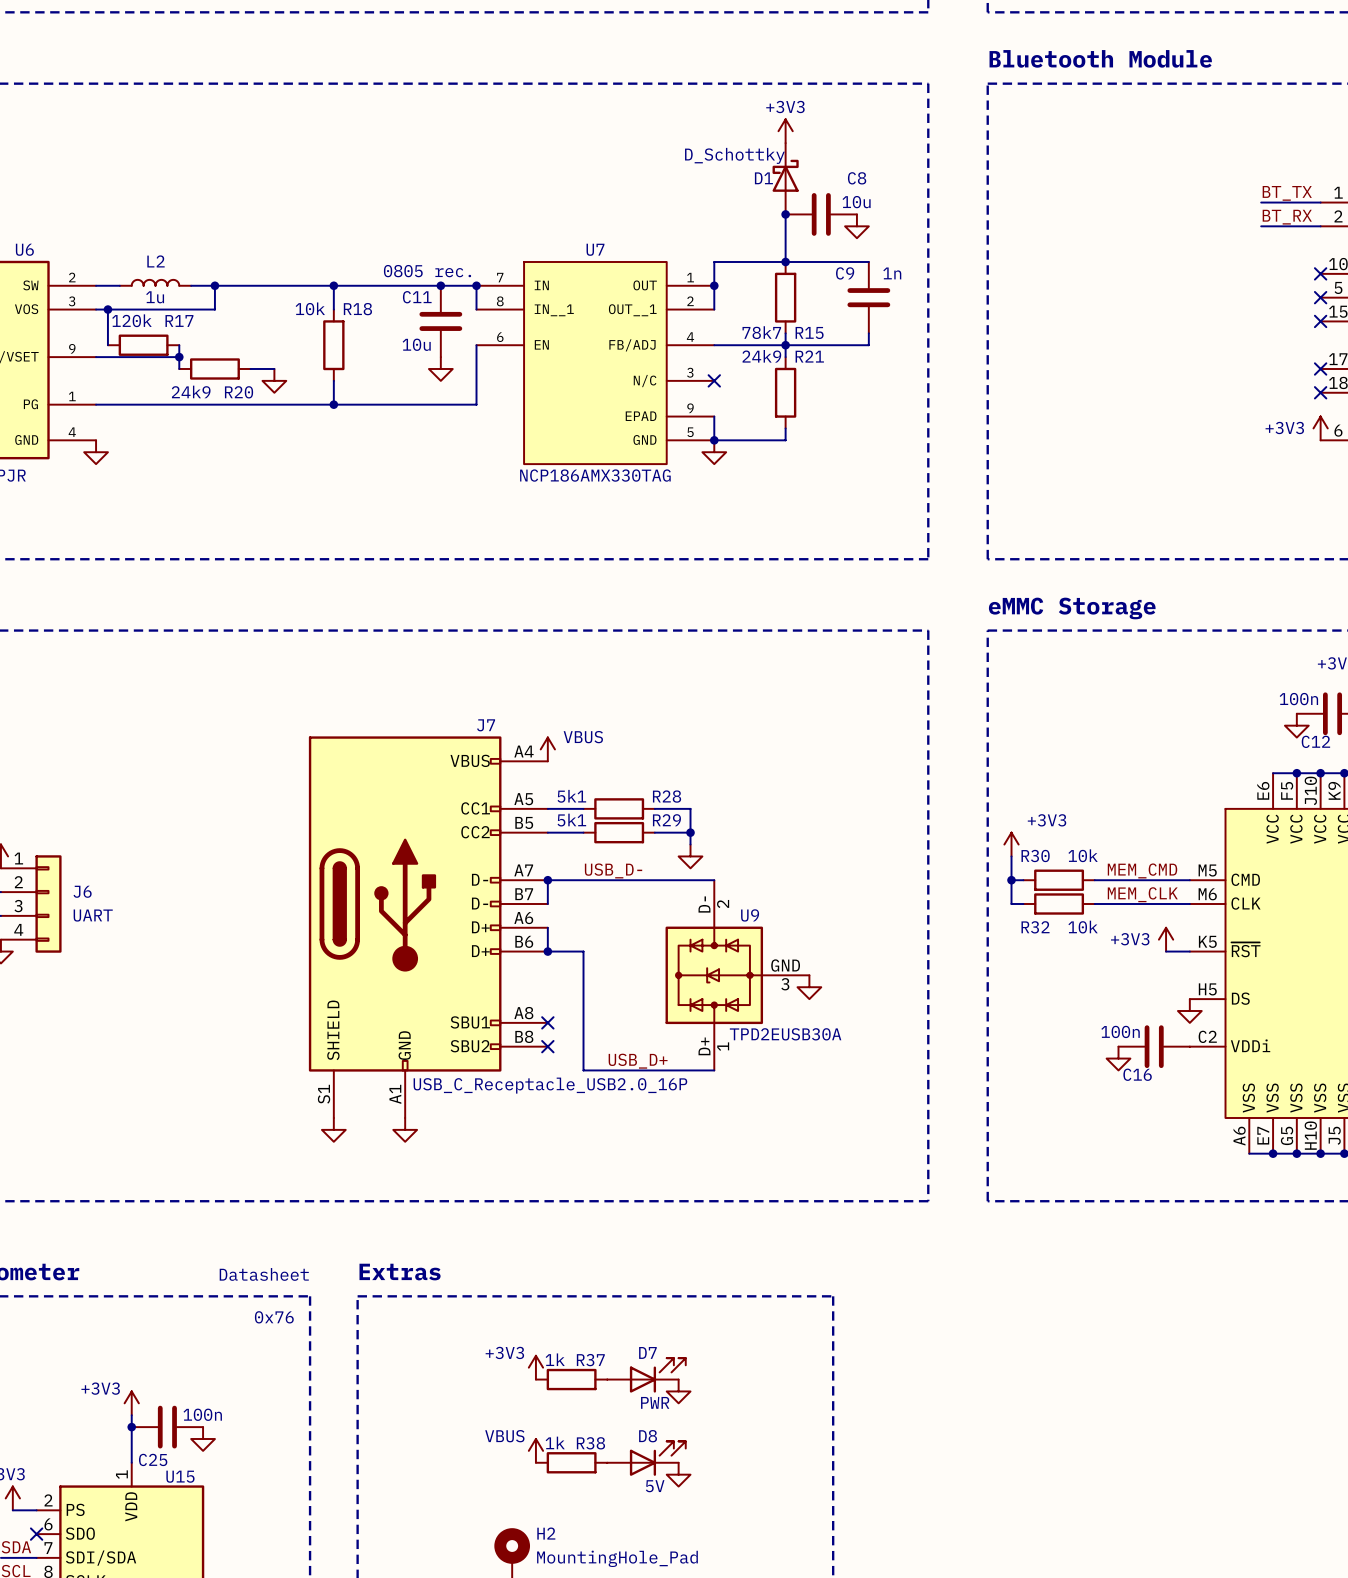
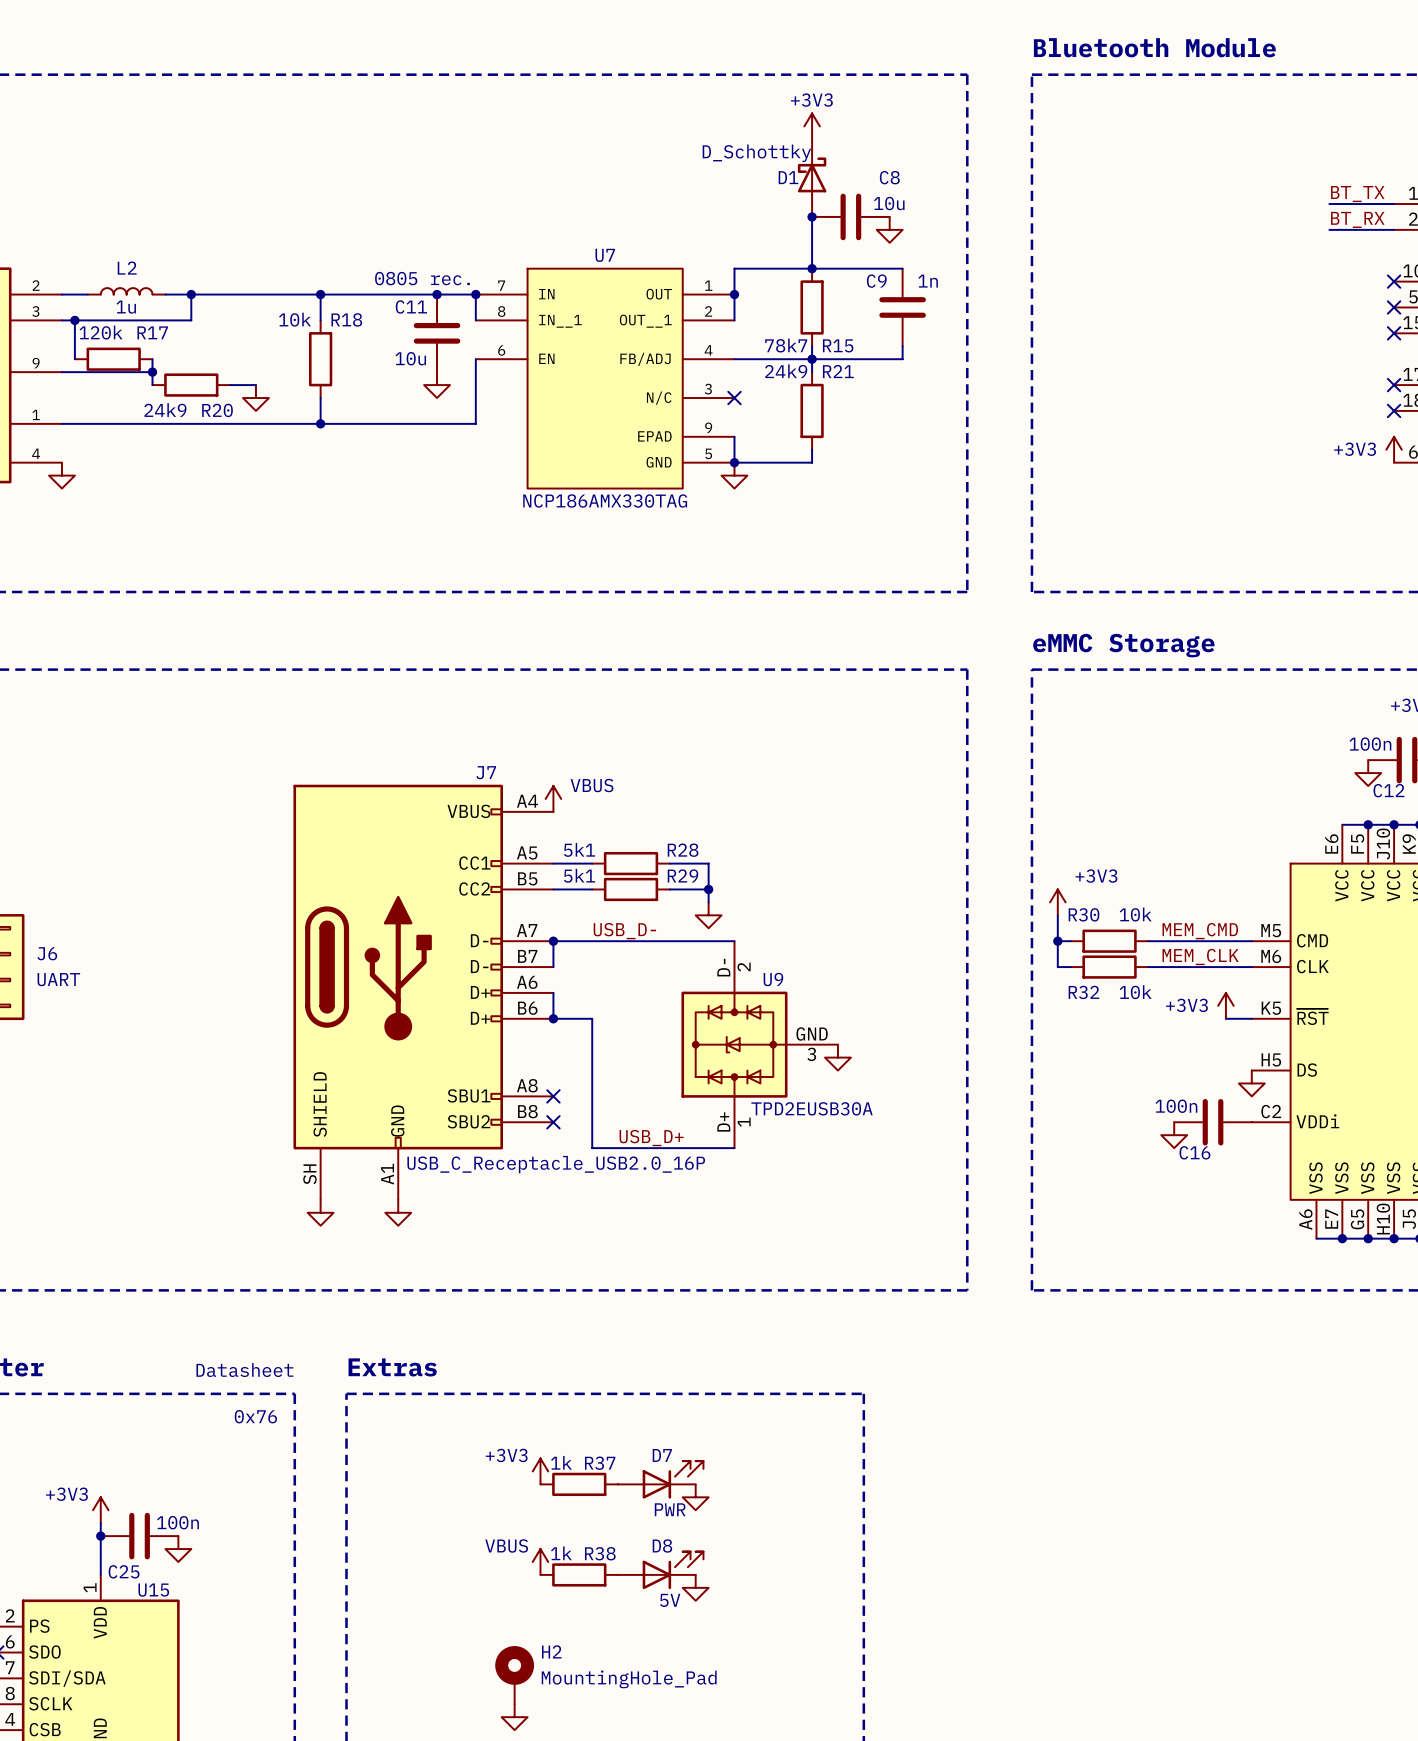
J7 pin number: S1 (324, 1094) -> SH (309, 1174)

